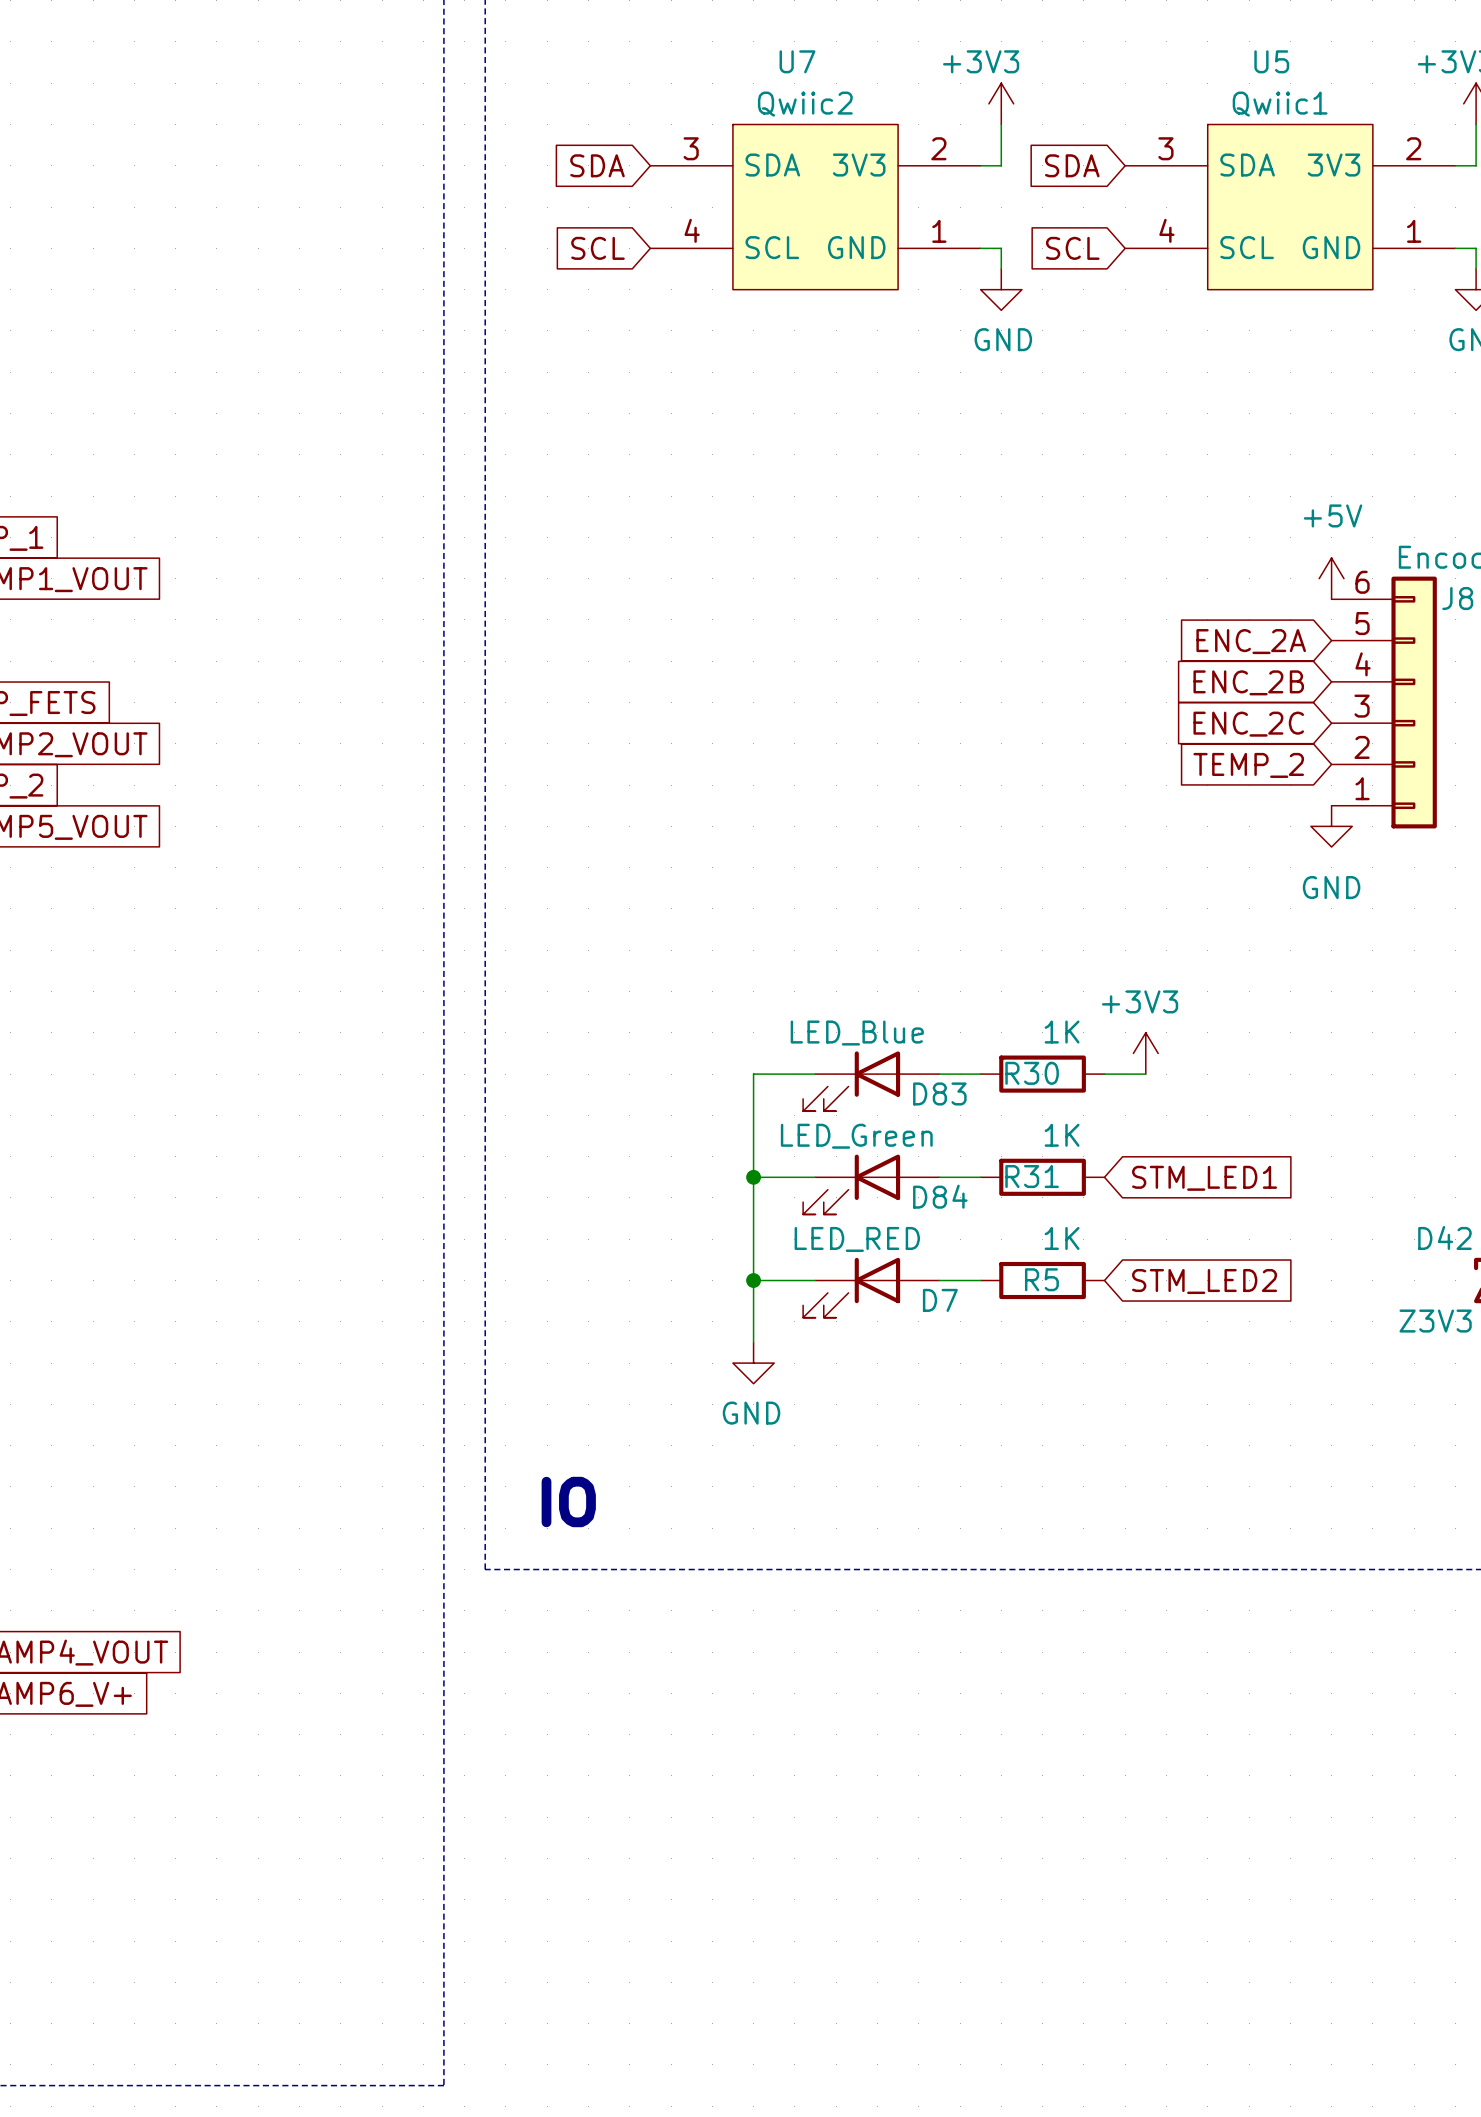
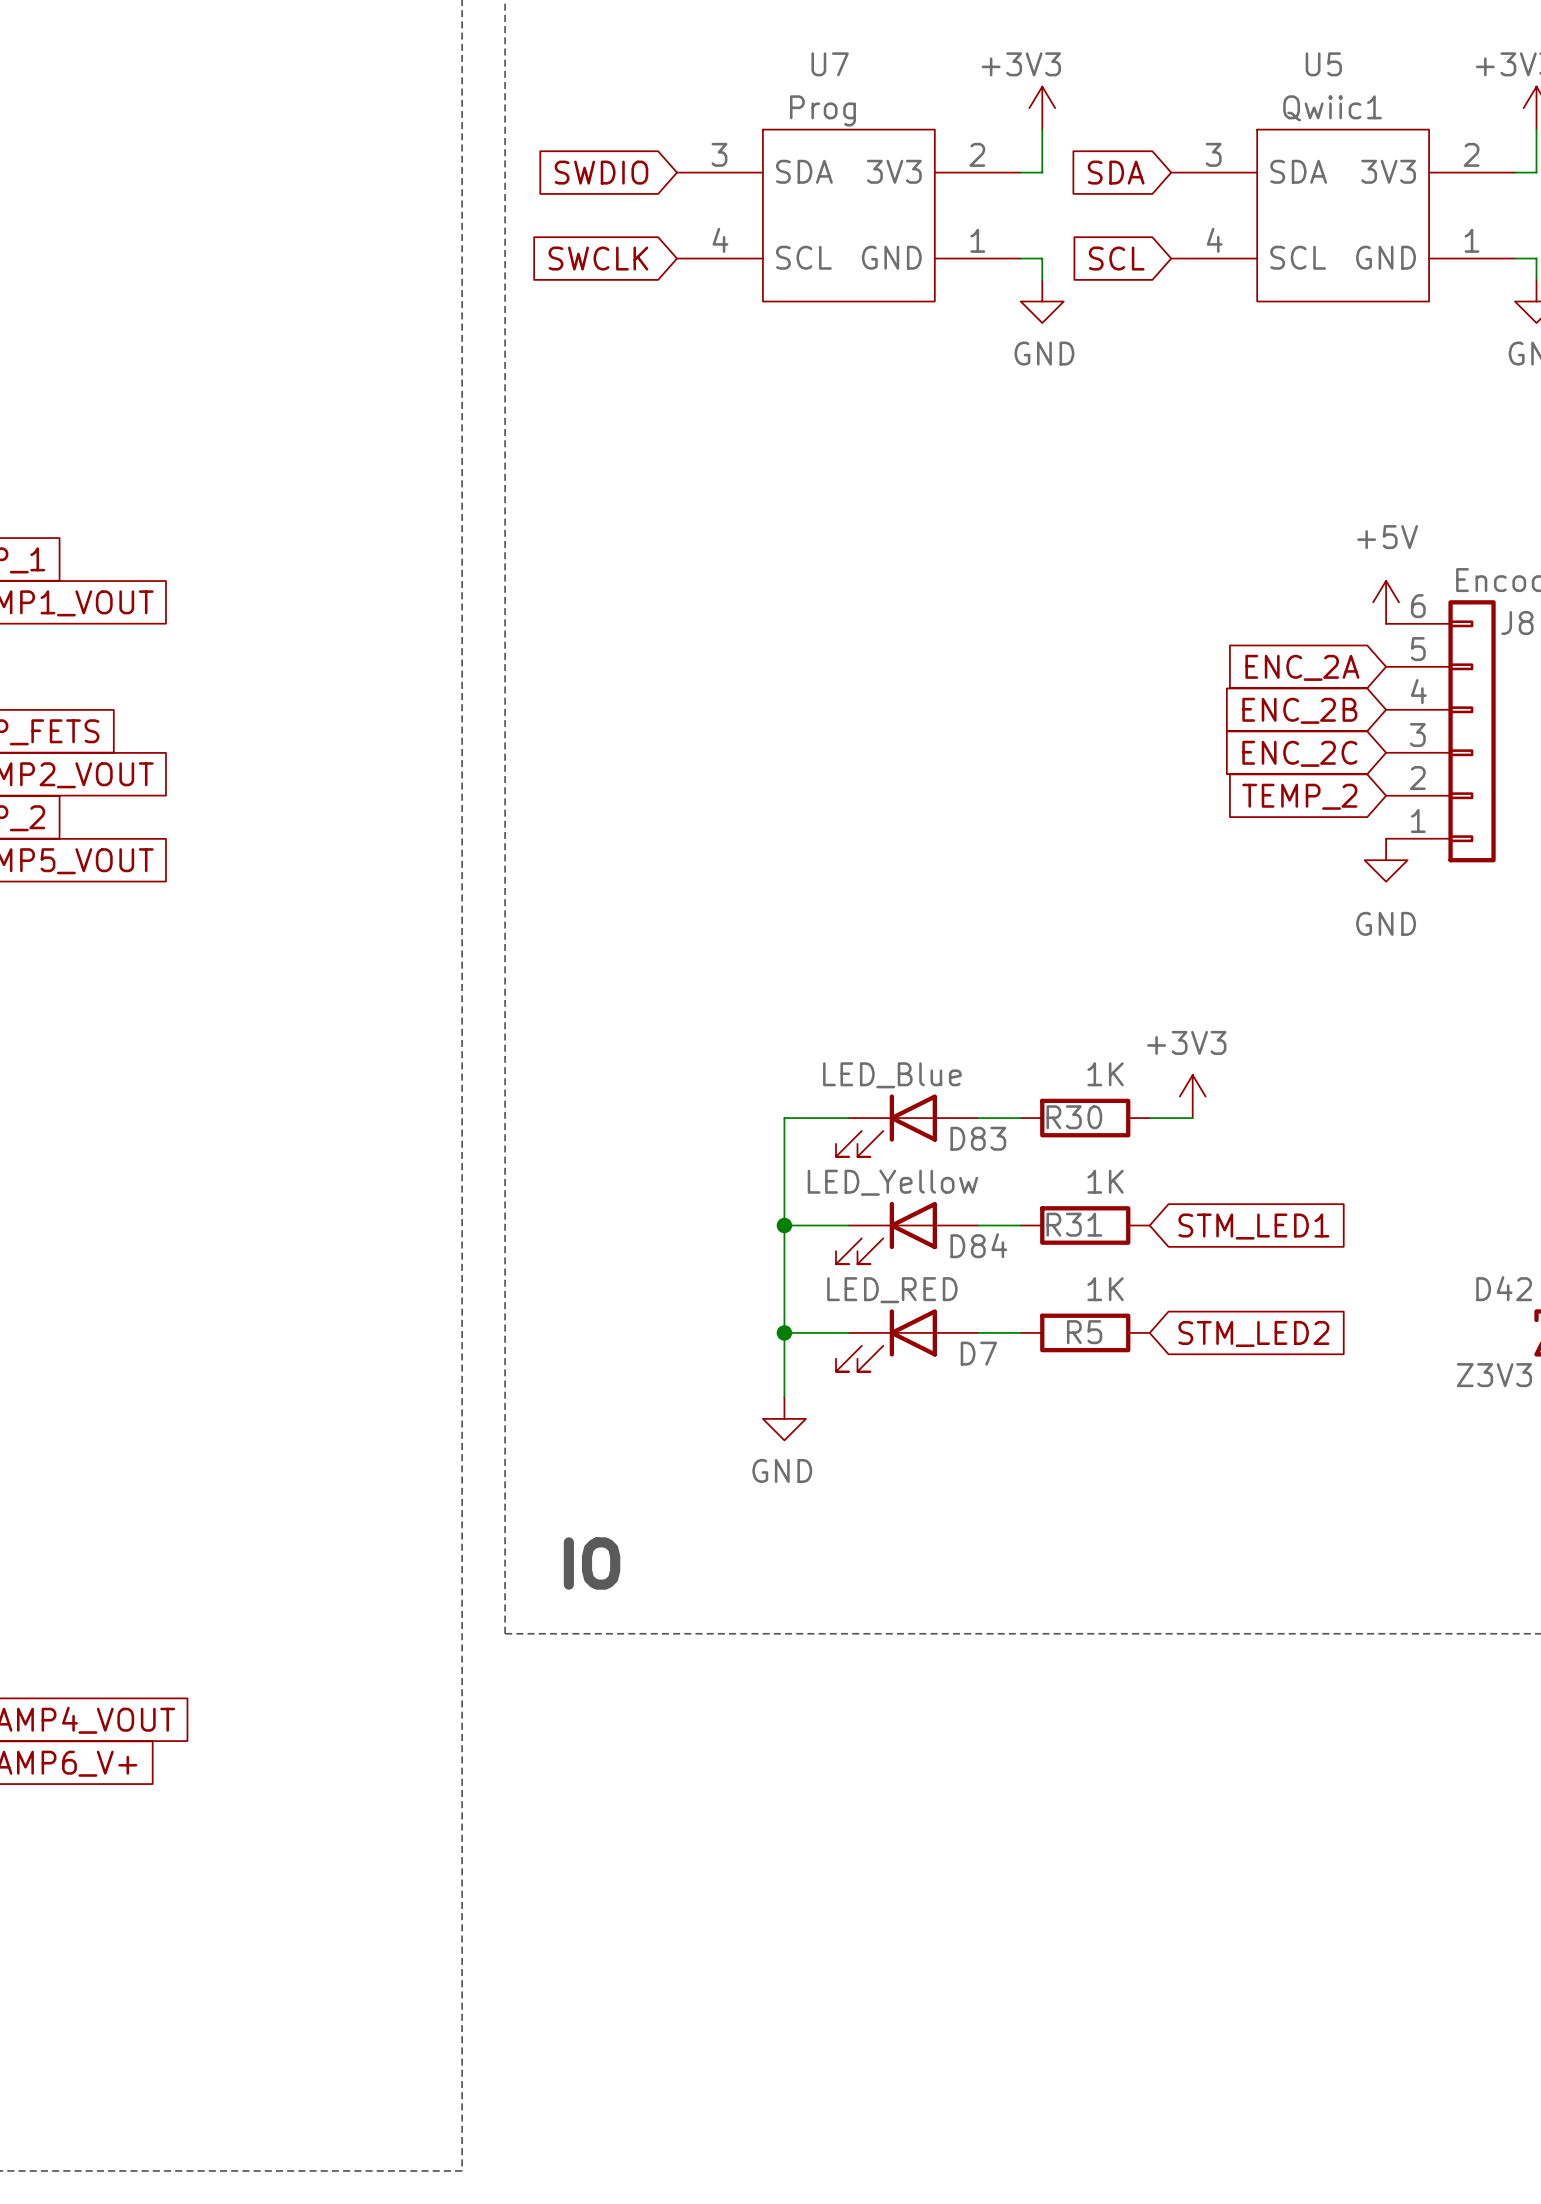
U7 value: Qwiic2 (805, 104) -> Prog (822, 110)
global label: SDA (597, 165) -> SWDIO (601, 172)
global label: SCL (597, 248) -> SWCLK (598, 258)
D84 value: LED_Green (856, 1136) -> LED_Yellow (892, 1182)

